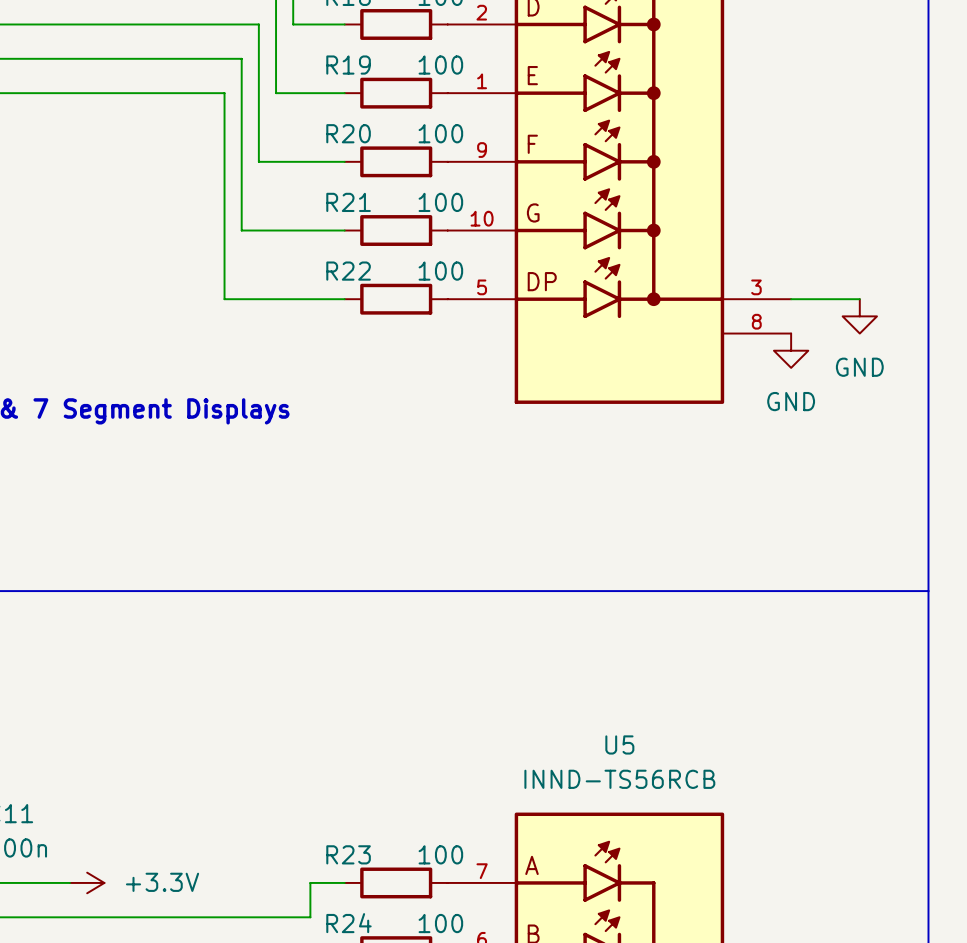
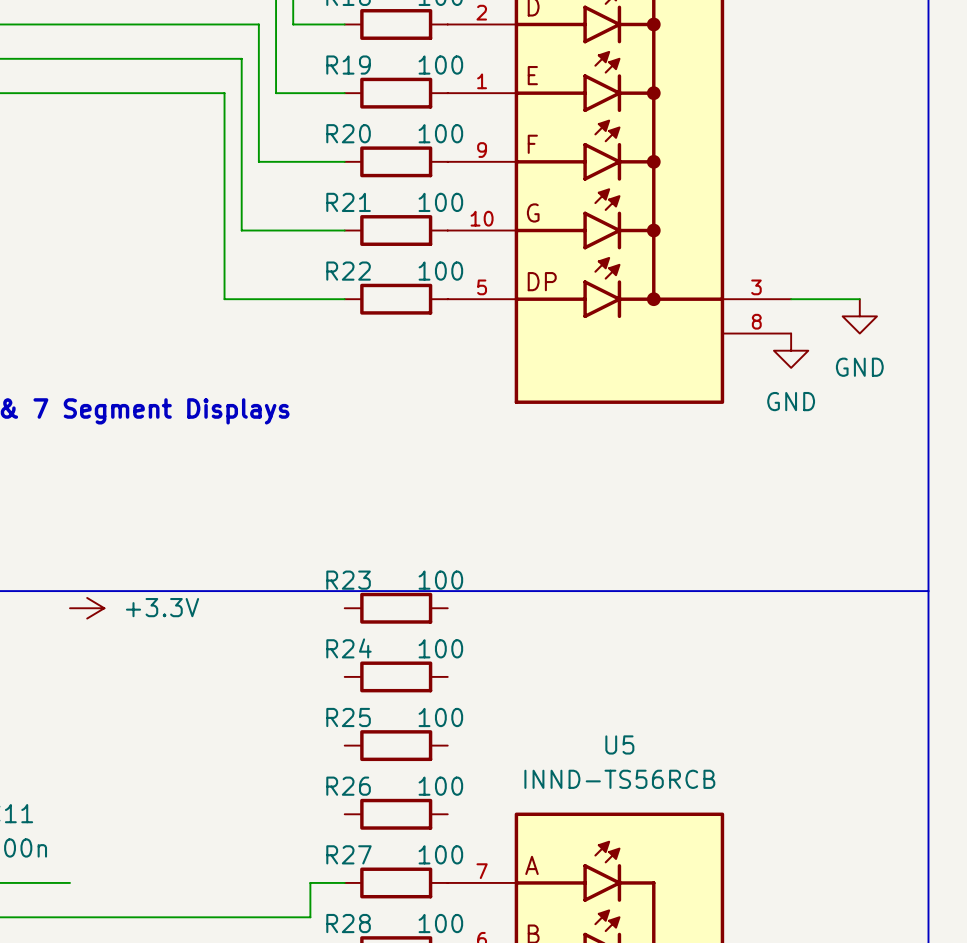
R23: none -> 100 (396, 608)
R24: none -> 100 (396, 676)
R25: none -> 100 (396, 745)
R26: none -> 100 (396, 814)
R23 name: R23 (348, 854) -> R27 (348, 854)
power symbol position: +3.3V (87, 882) -> +3.3V (87, 608)
R24 name: R24 (348, 923) -> R28 (348, 923)

